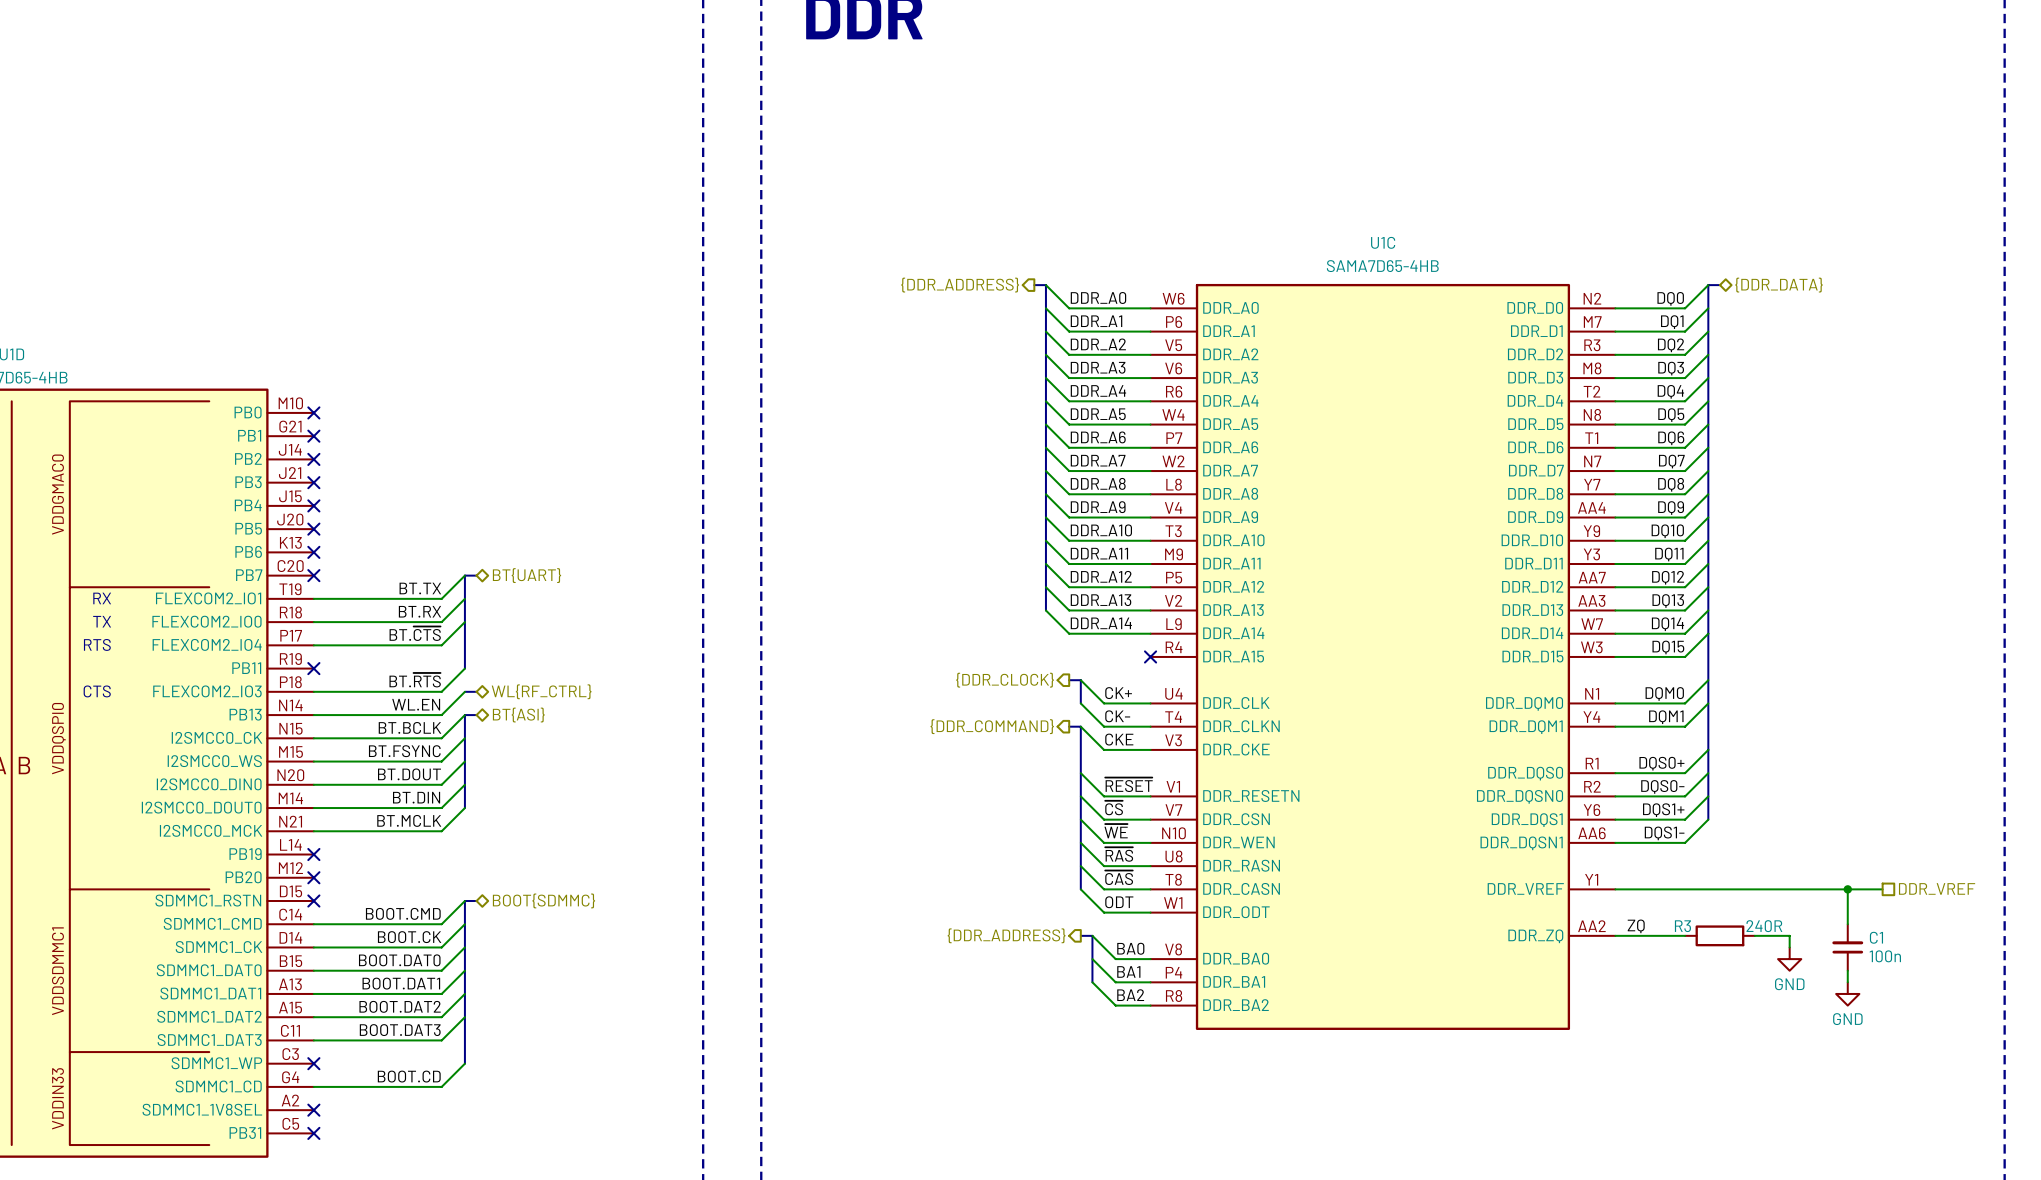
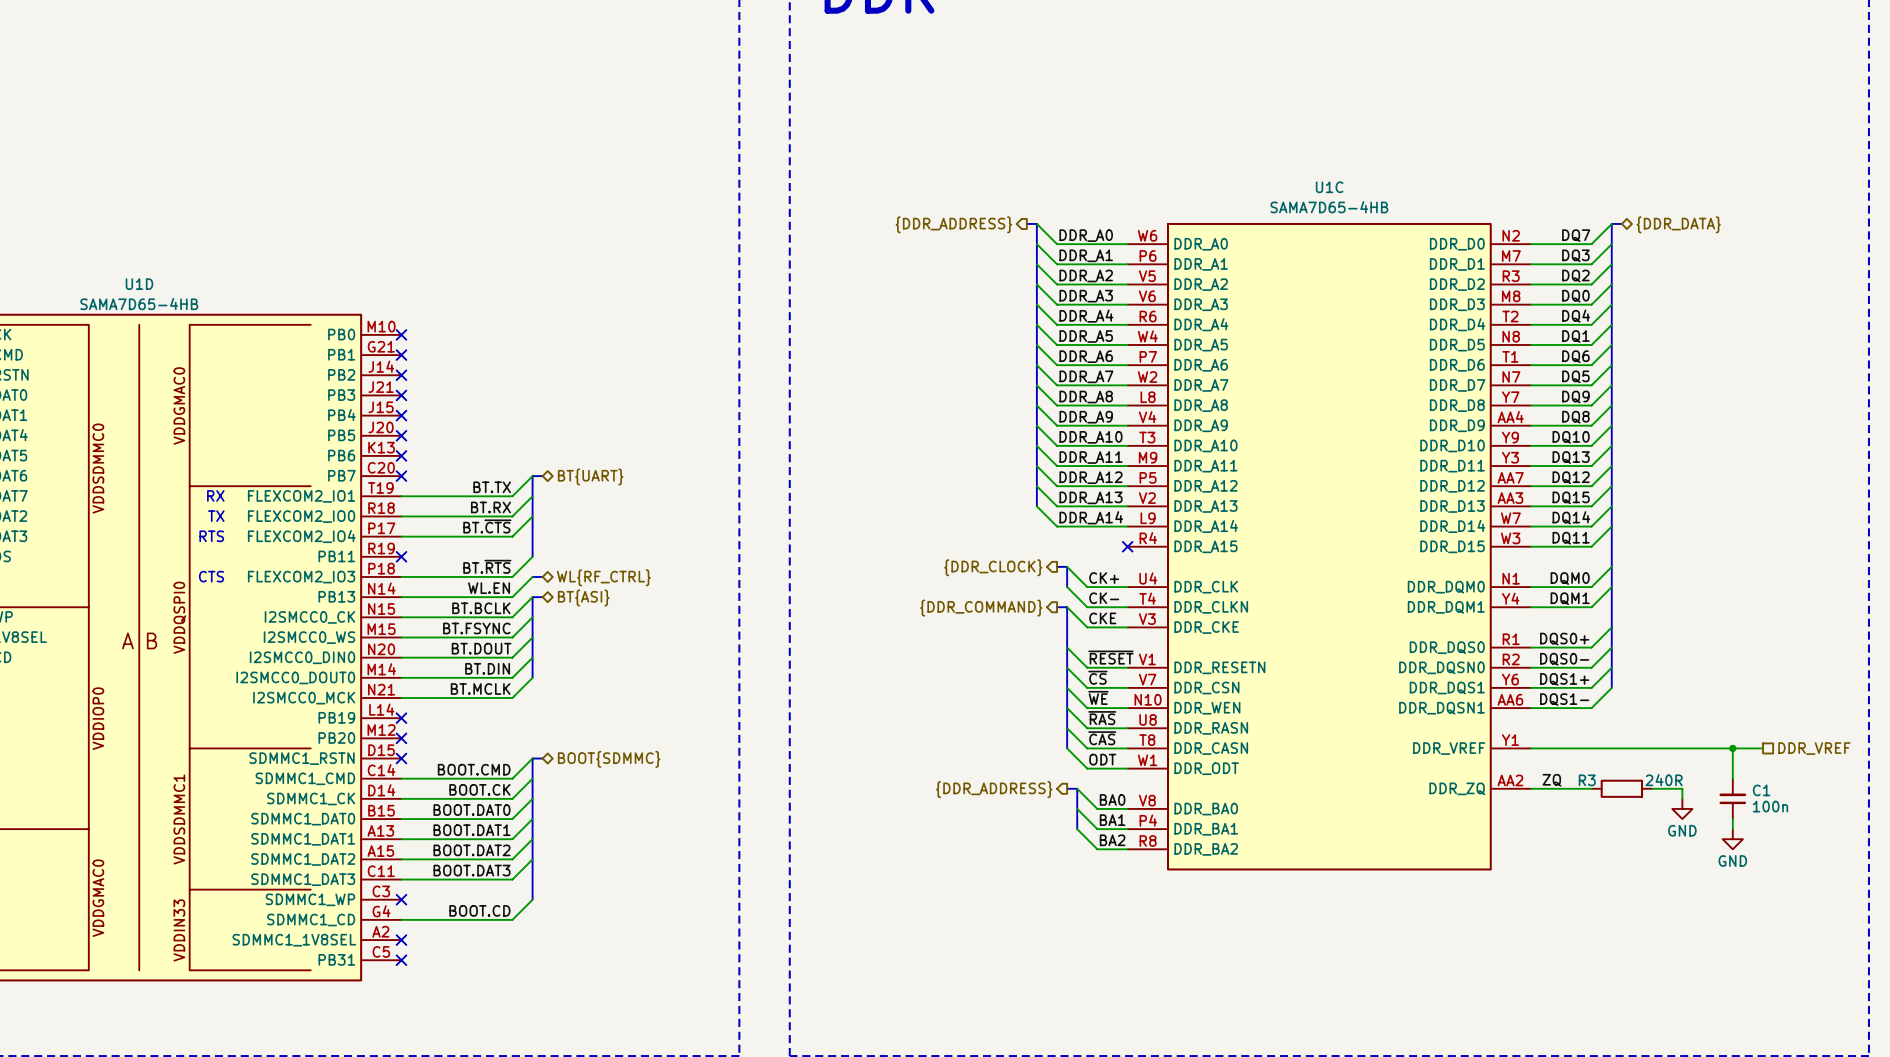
label: DQ0 (1670, 298) -> DQ7 (1576, 235)
label: DQ1 (1672, 322) -> DQ3 (1575, 255)
label: DQ3 (1671, 368) -> DQ0 (1575, 296)
label: DQ5 (1671, 415) -> DQ1 (1575, 336)
label: DQ7 (1671, 461) -> DQ5 (1575, 376)
label: DQ8 (1671, 484) -> DQ9 (1575, 397)
label: DQ9 (1671, 508) -> DQ8 (1575, 417)
label: DQ11 (1669, 554) -> DQ13 (1571, 457)
label: DQ13 (1668, 601) -> DQ15 (1571, 497)
label: DQ15 (1668, 647) -> DQ11 (1571, 538)

